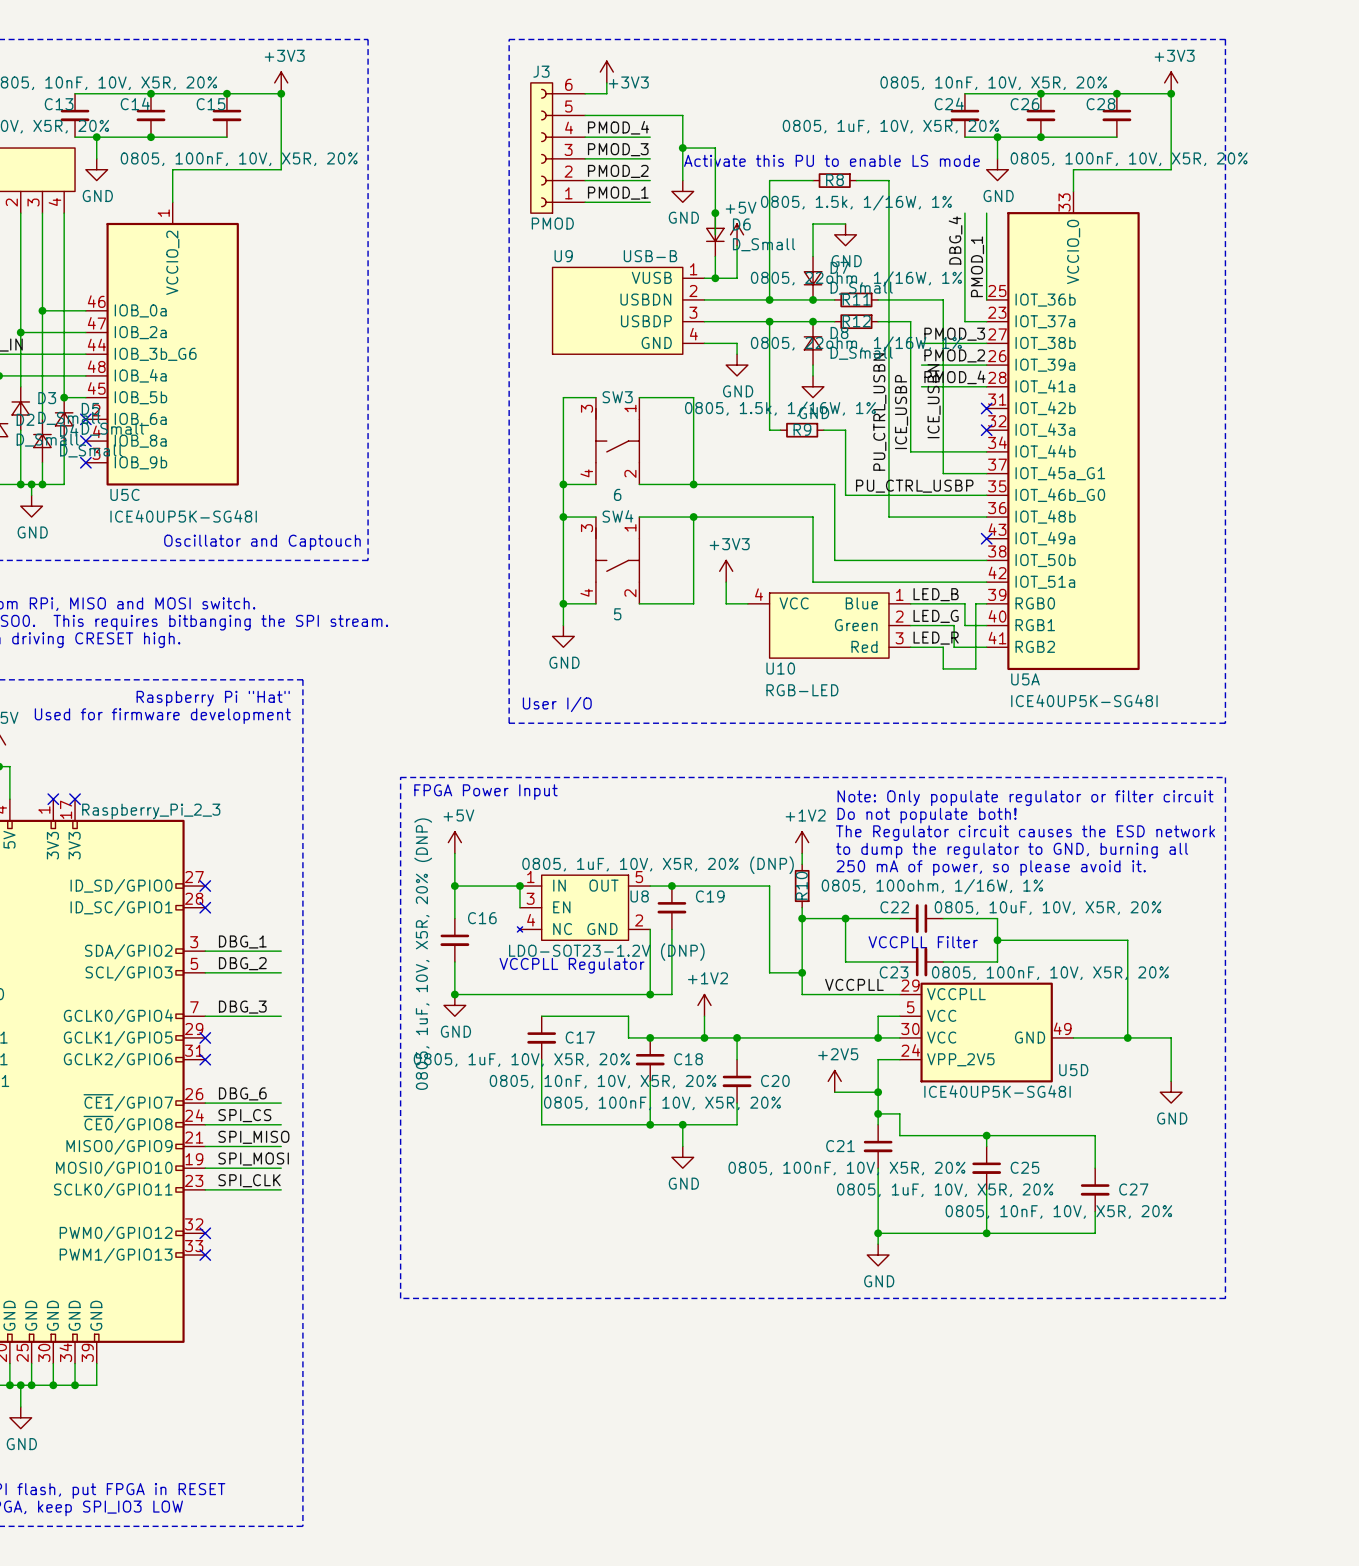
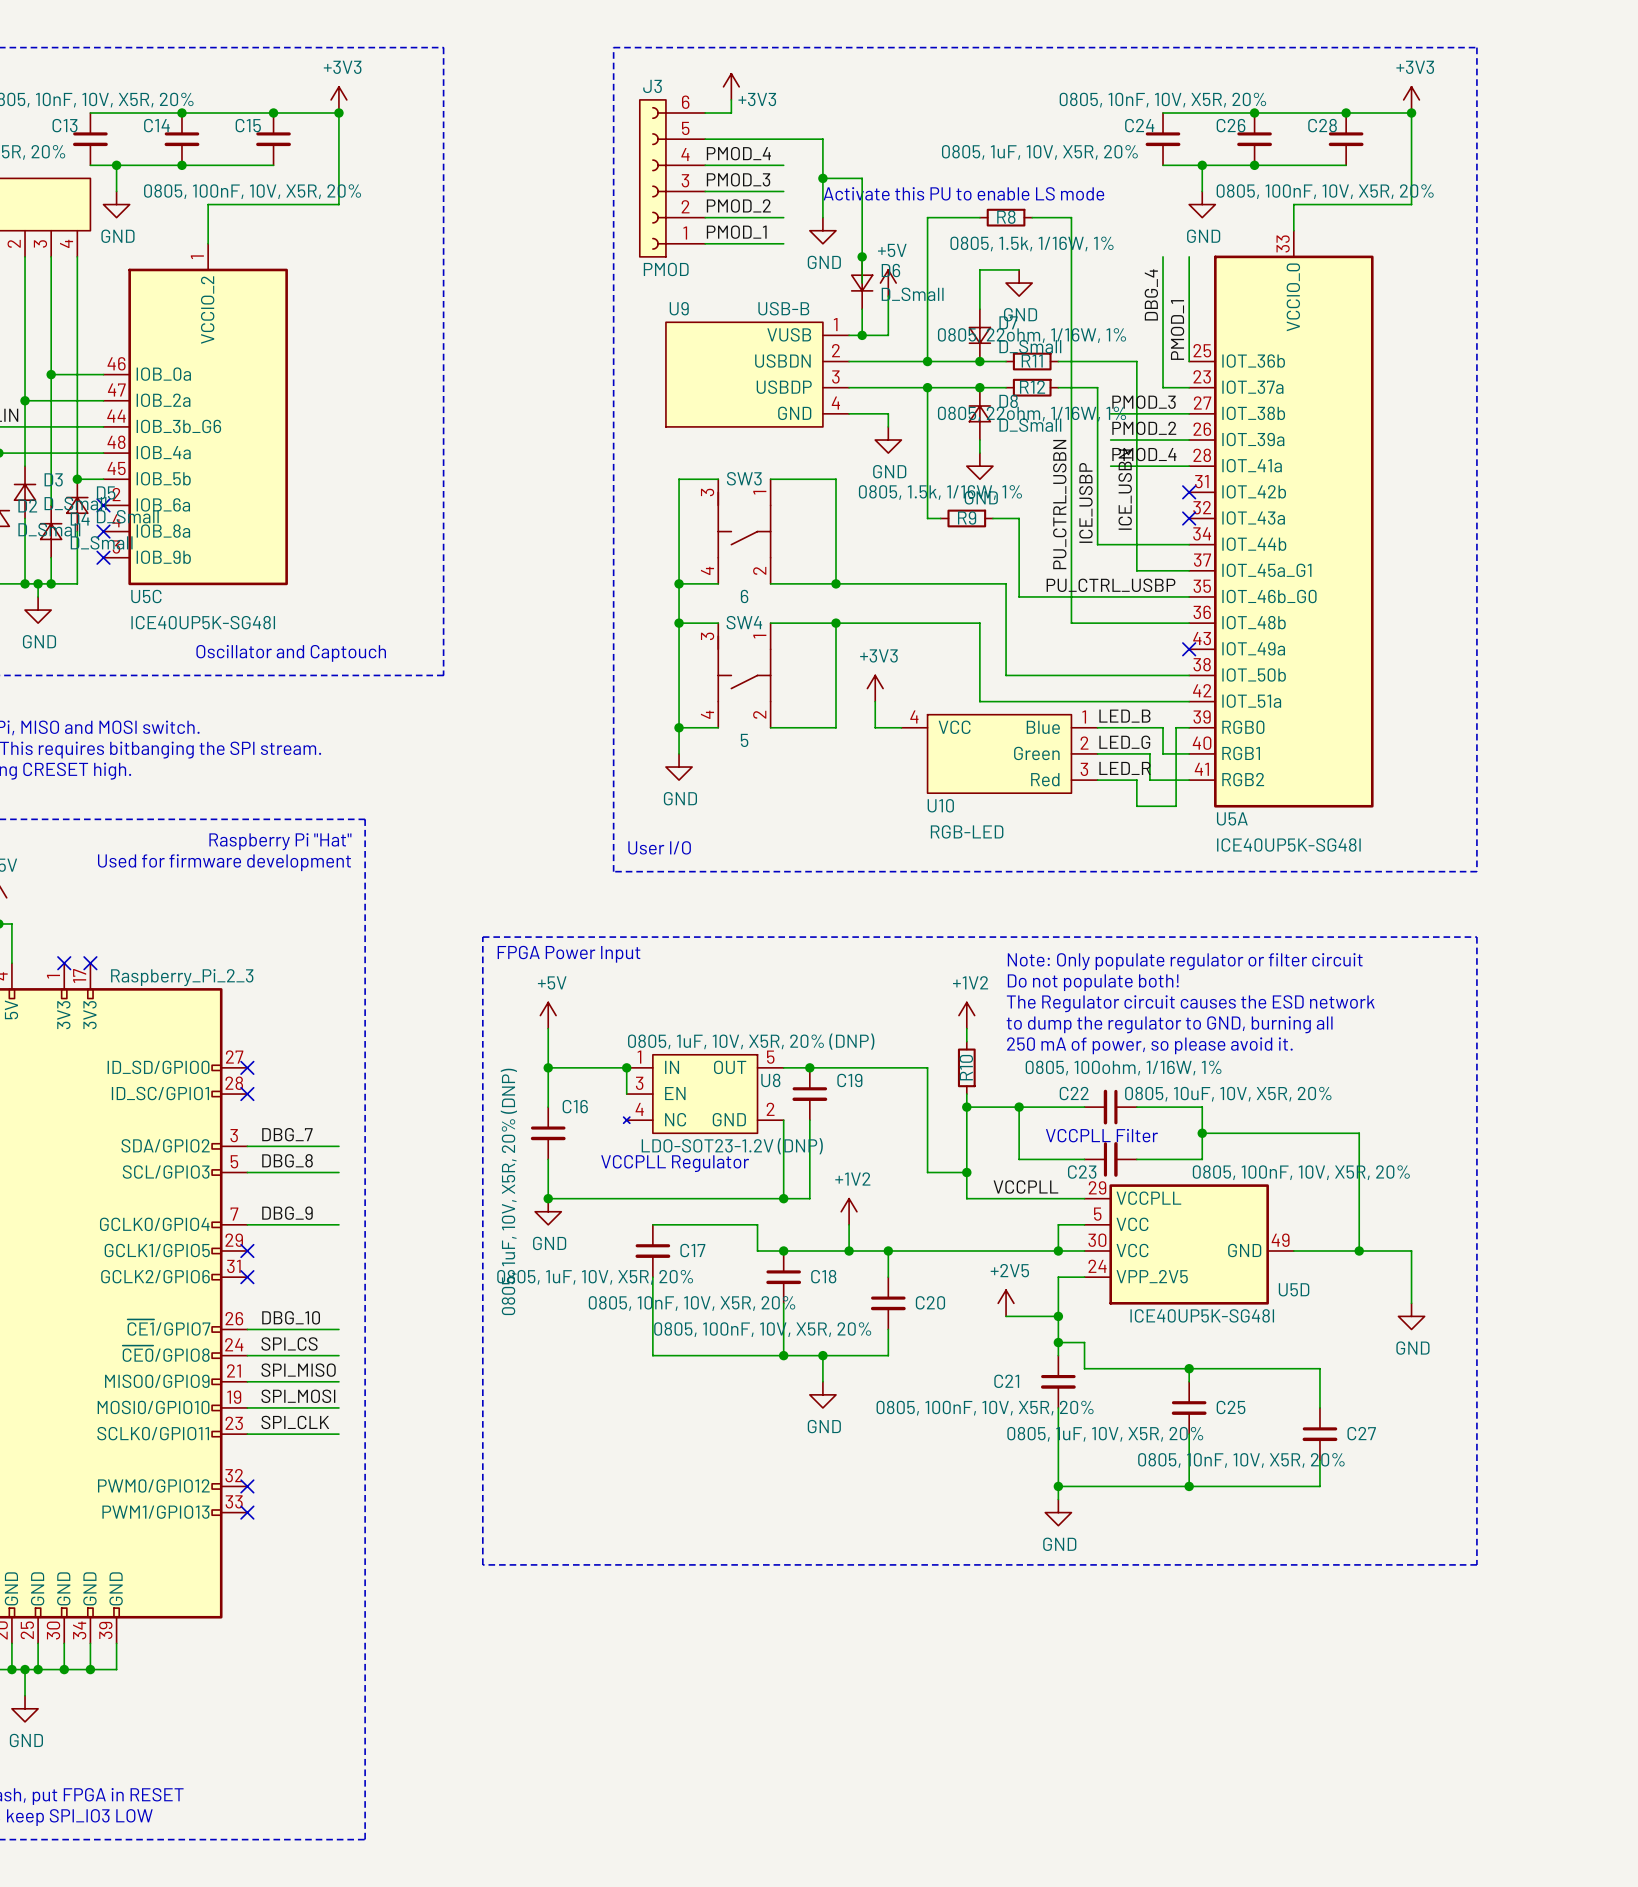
label: DBG_1 (242, 941) -> DBG_7 (287, 1134)
label: DBG_2 (242, 963) -> DBG_8 (287, 1160)
label: DBG_3 (242, 1007) -> DBG_9 (287, 1213)
label: DBG_6 (242, 1093) -> DBG_10 (291, 1317)

